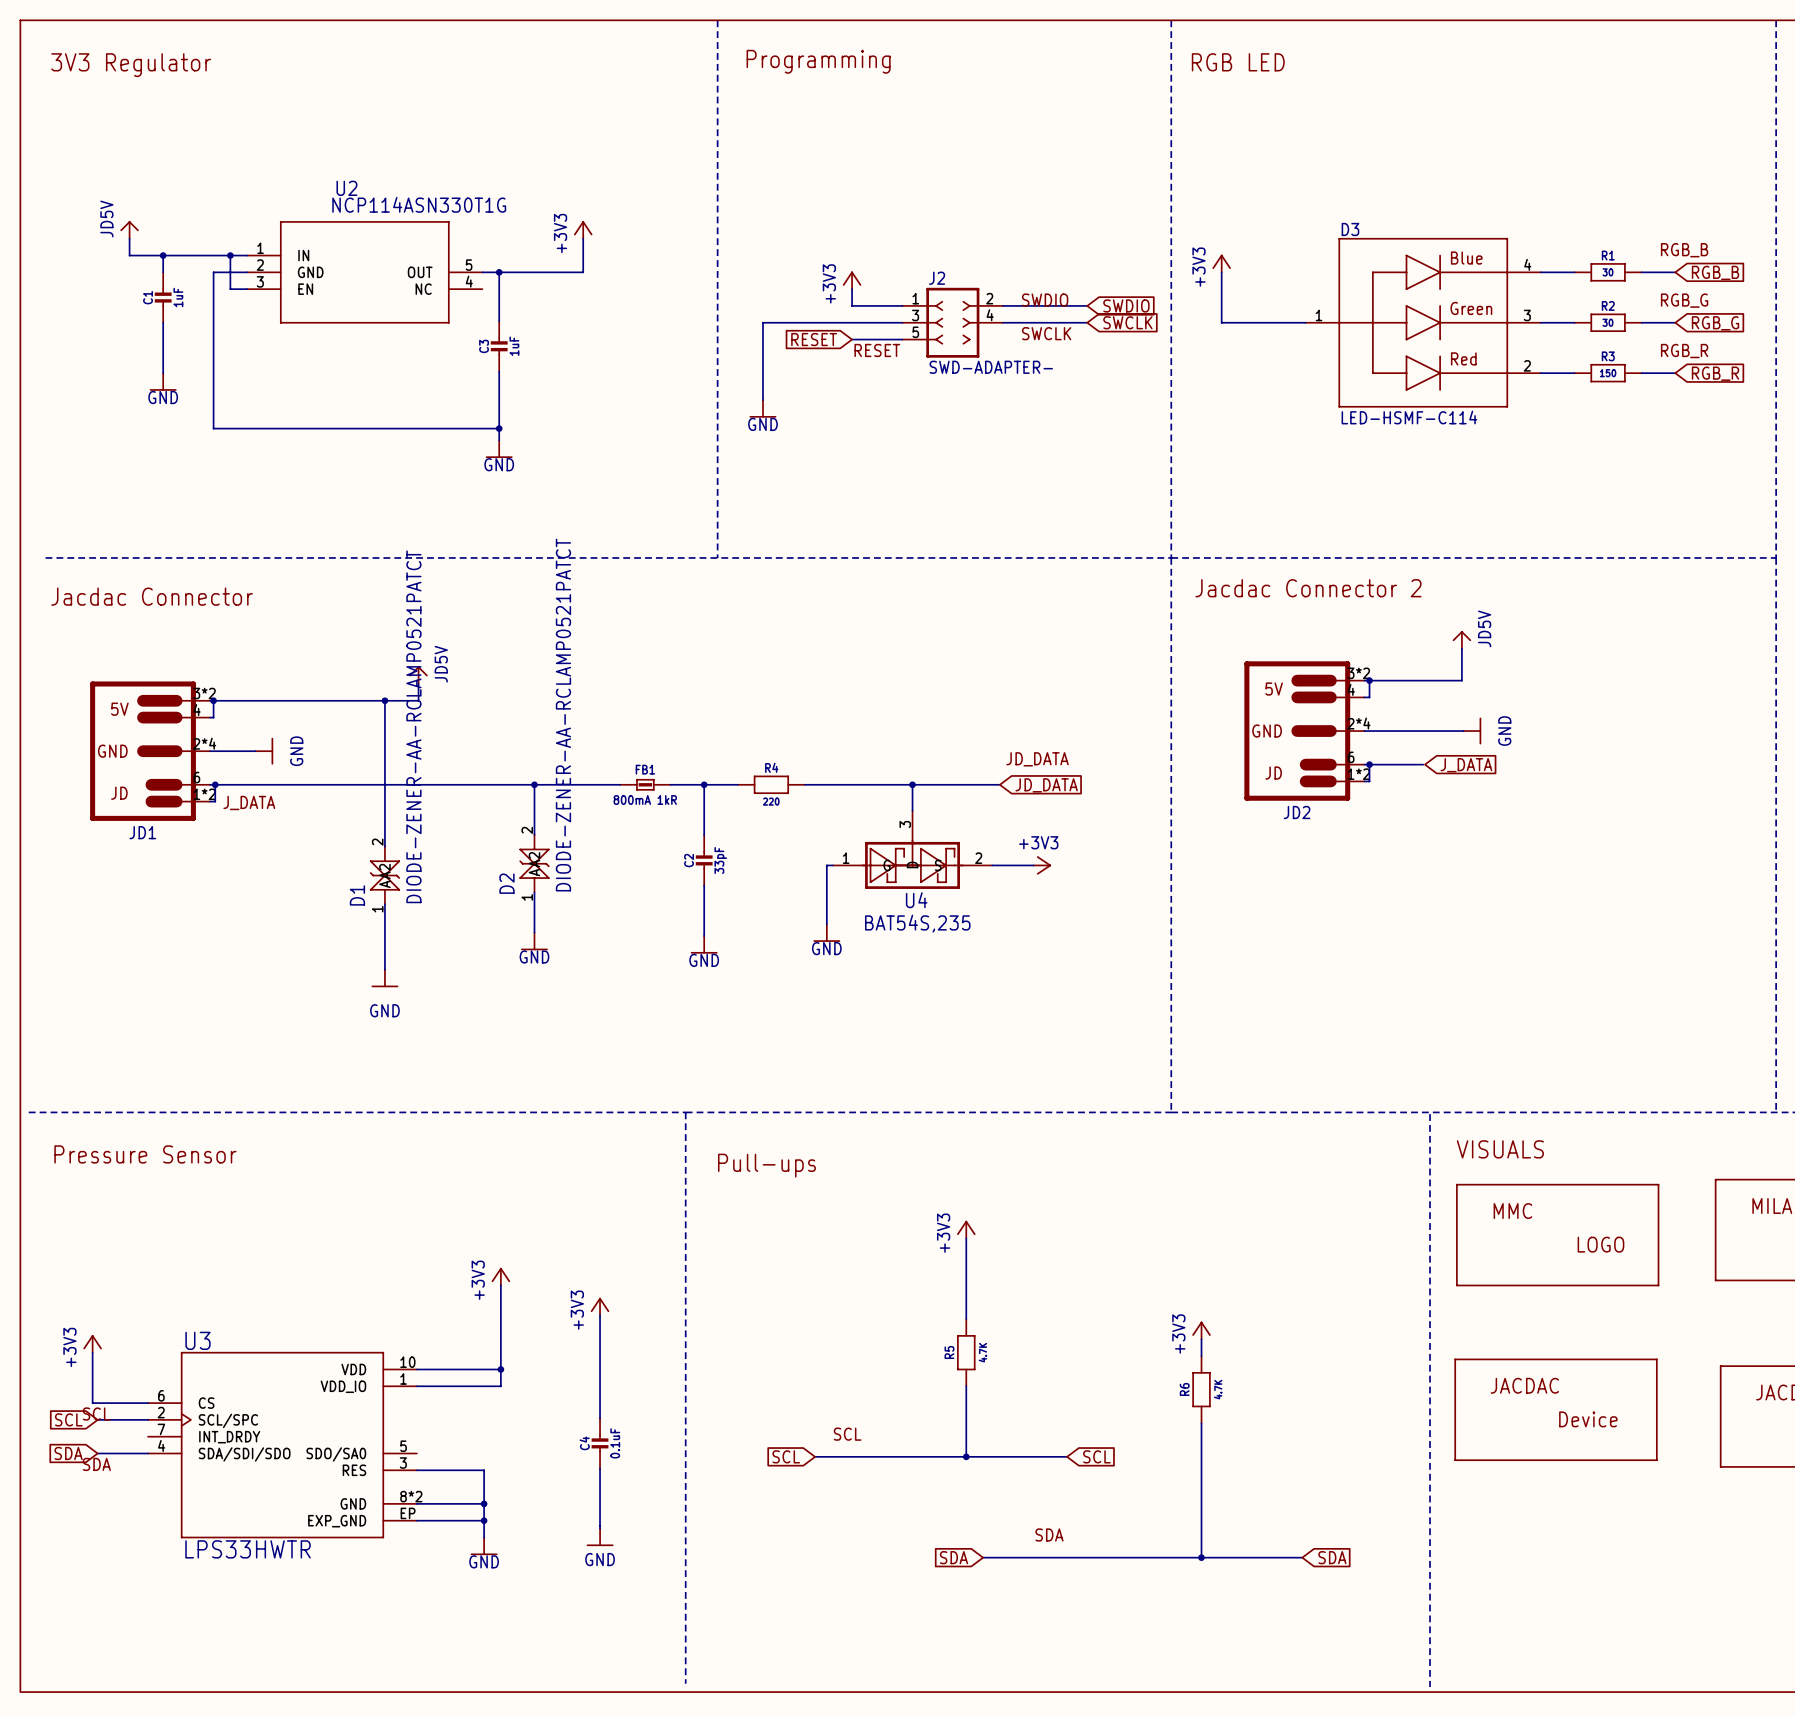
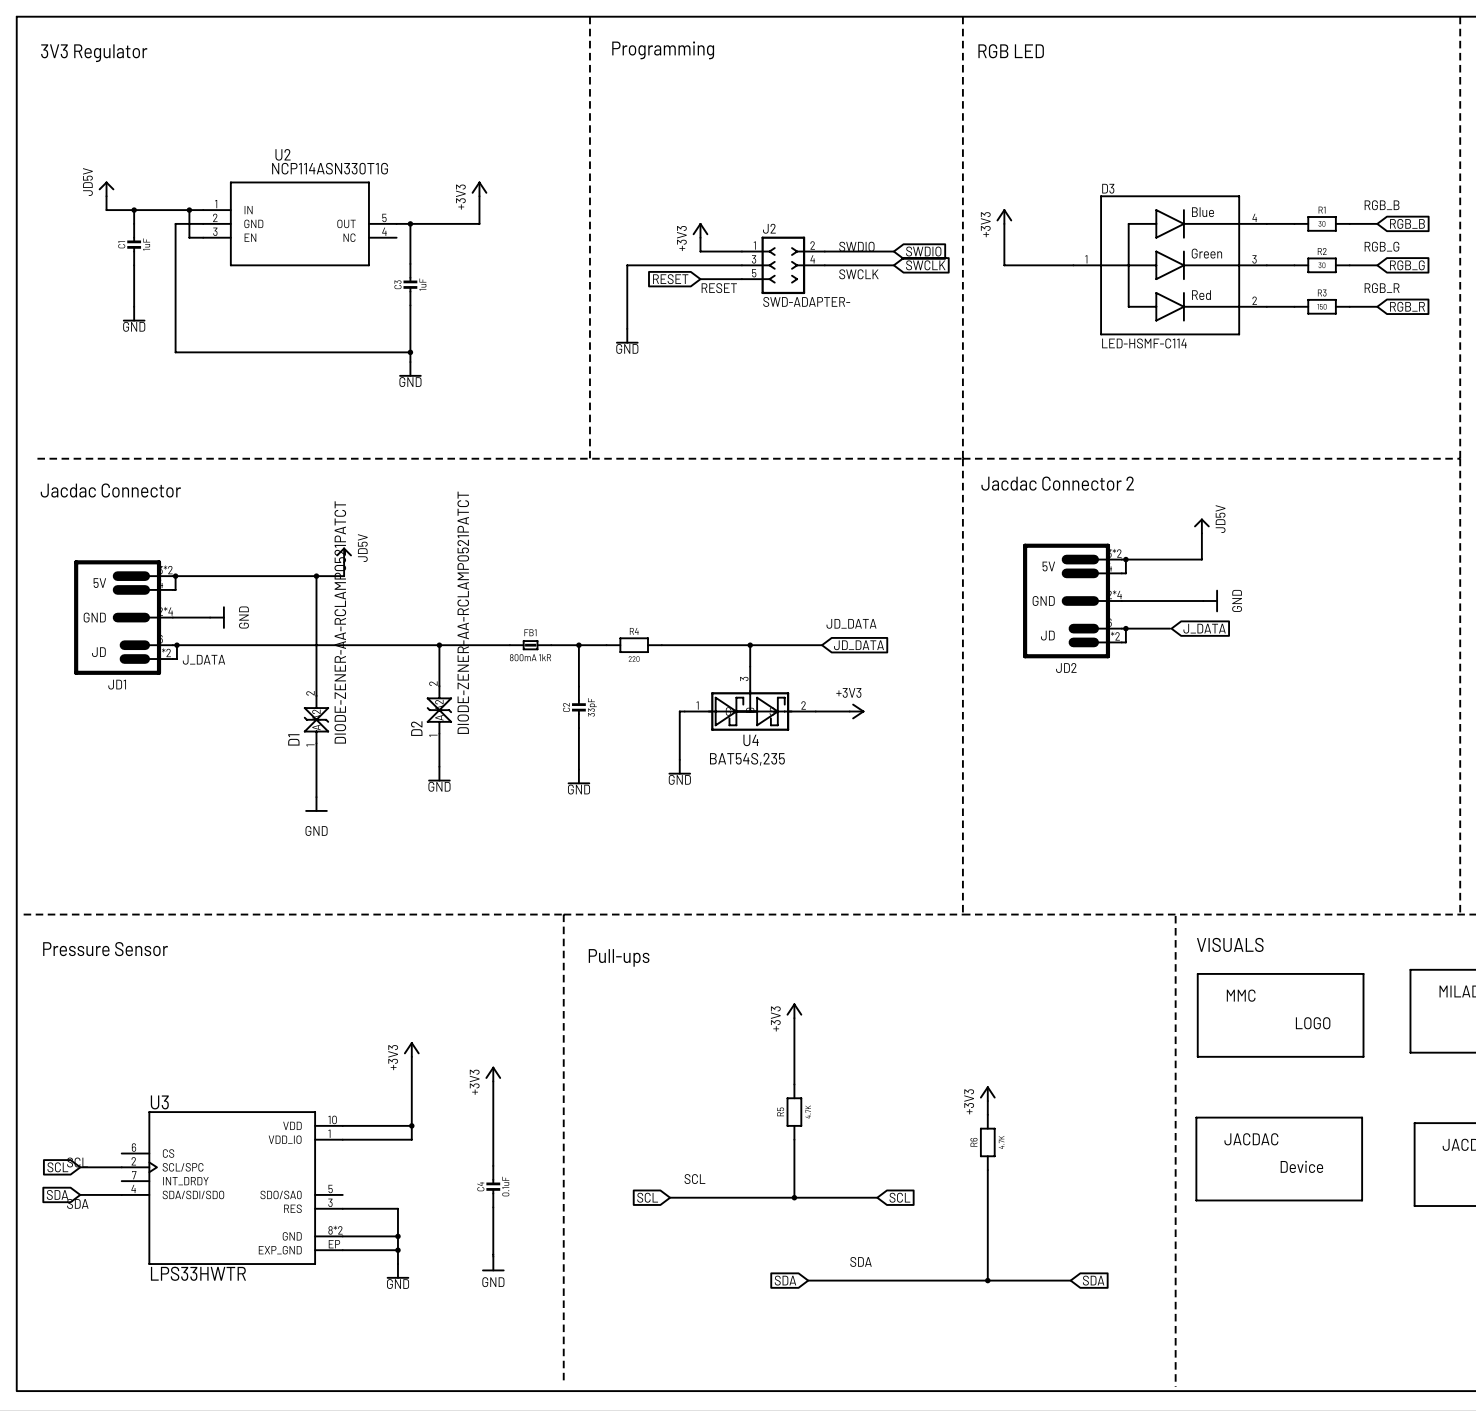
power symbol: +3V3 (92, 1343) -> none
wire: (92, 1352) (92, 1403) (148, 1403) -> none

